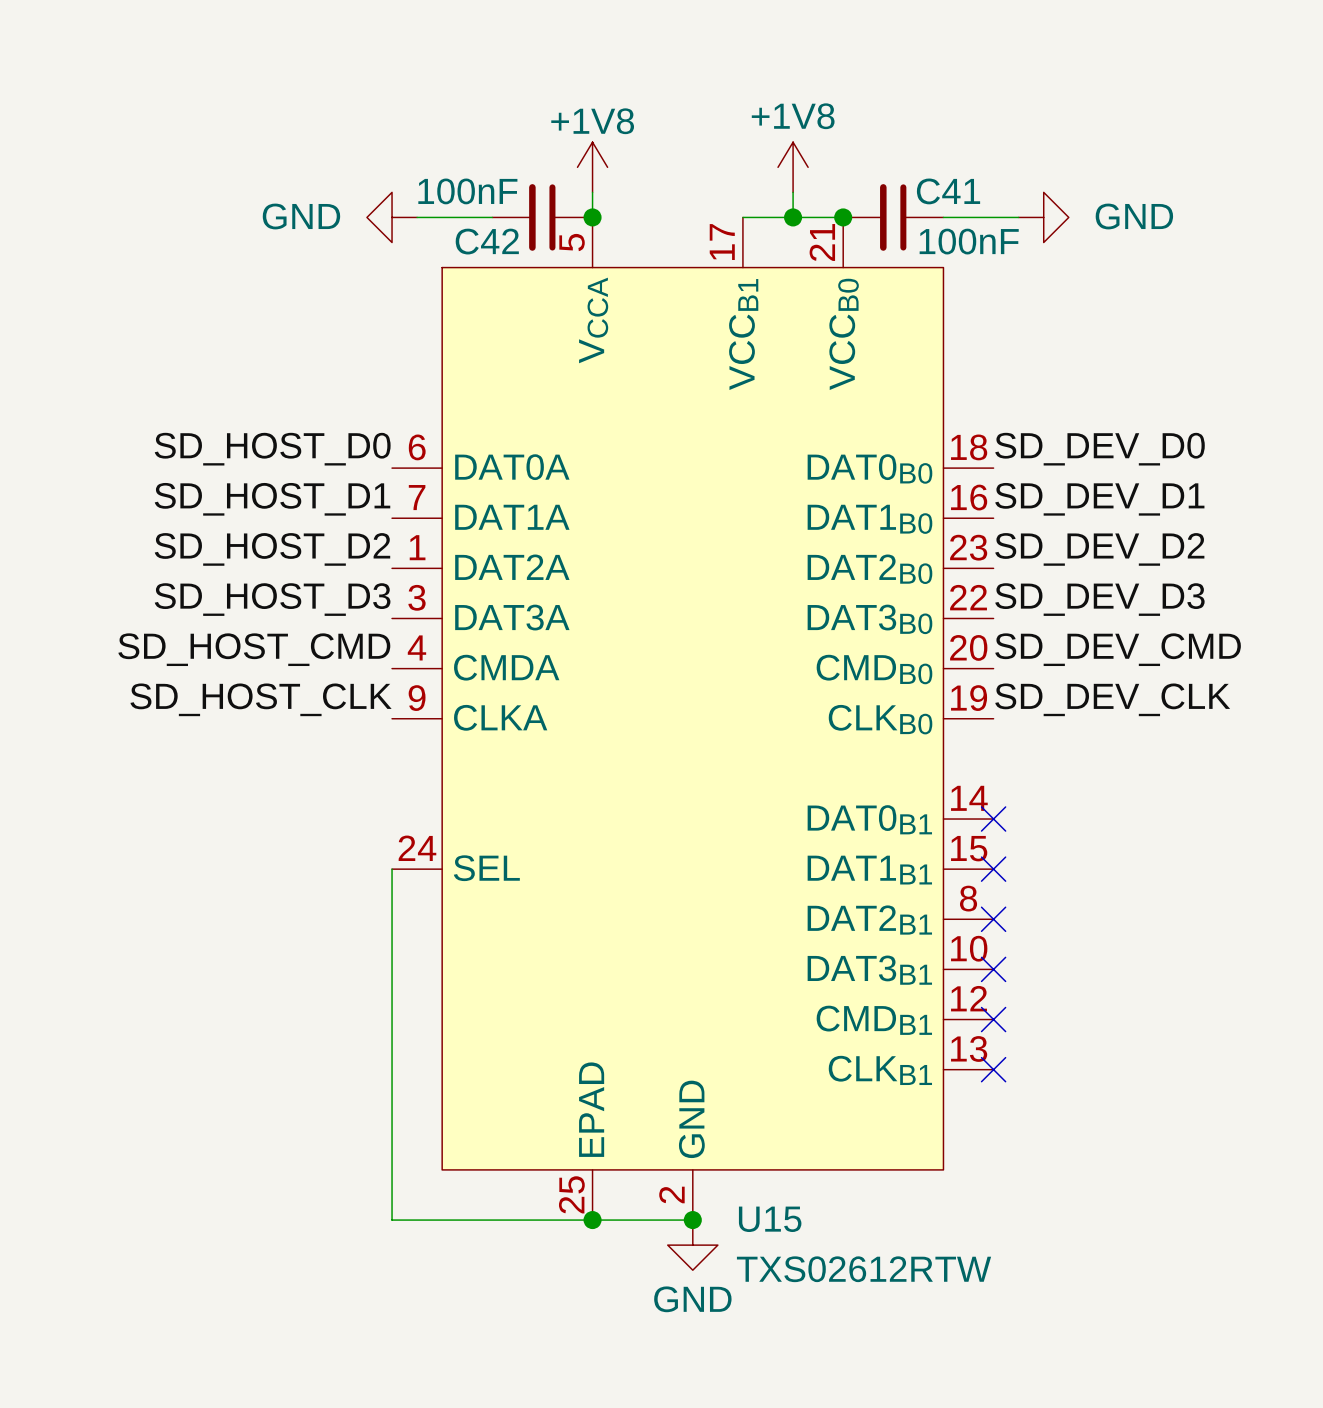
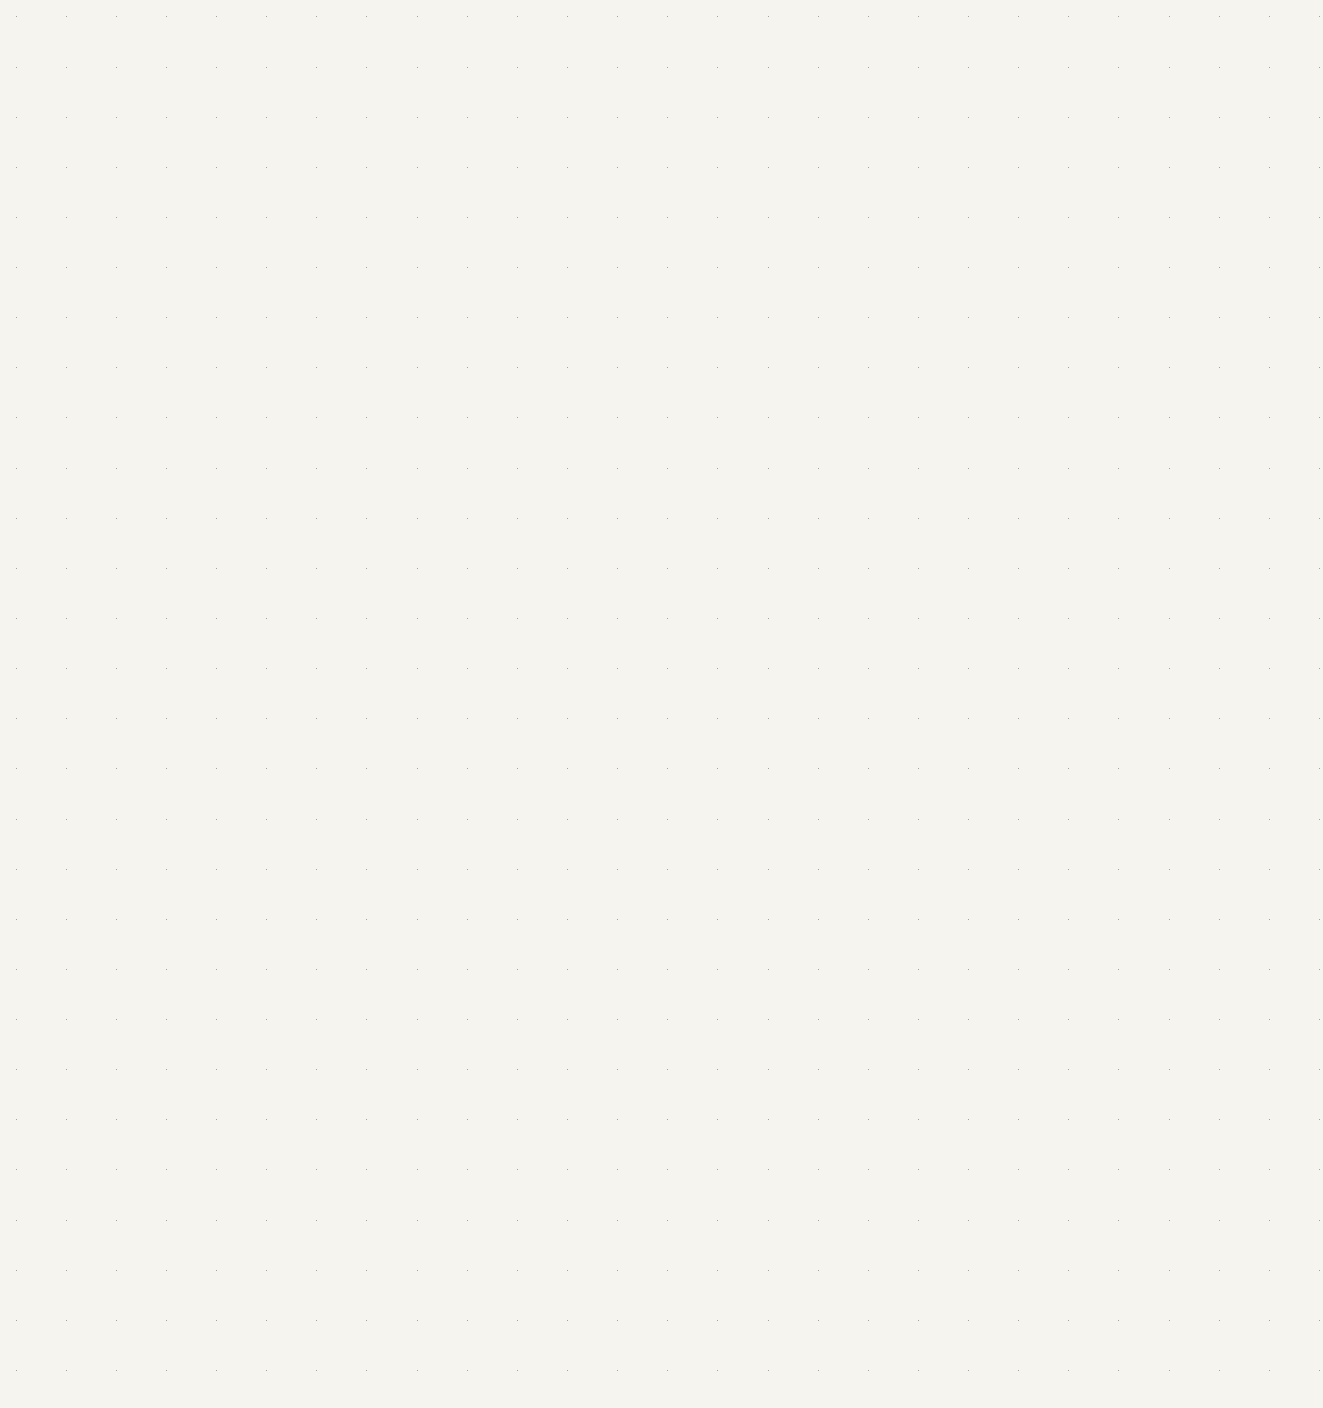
power symbol: +1V8 (592, 167) -> none
power symbol: +1V8 (793, 167) -> none
wire: (592, 192) (592, 217) -> none
wire: (793, 192) (793, 217) -> none
power symbol: GND (392, 217) -> none
wire: (417, 217) (492, 217) -> none
C42: 100nF (542, 217) -> none
junction: (592, 217) -> none
wire: (742, 217) (843, 217) -> none
junction: (793, 217) -> none
junction: (843, 217) -> none
C41: 100nF (893, 217) -> none
wire: (943, 217) (1018, 217) -> none
power symbol: GND (1043, 217) -> none
label: SD_HOST_D0 (272, 449) -> none
label: SD_DEV_D0 (1100, 449) -> none
label: SD_HOST_D1 (272, 499) -> none
label: SD_DEV_D1 (1099, 499) -> none
label: SD_HOST_D2 (272, 549) -> none
label: SD_DEV_D2 (1099, 549) -> none
label: SD_HOST_D3 (272, 599) -> none
label: SD_DEV_D3 (1099, 599) -> none
label: SD_HOST_CMD (254, 649) -> none
label: SD_DEV_CMD (1118, 649) -> none
label: SD_HOST_CLK (261, 699) -> none
label: SD_DEV_CLK (1112, 699) -> none
U15: TXS02612RTW (692, 718) -> none
no-connect mark: (993, 819) -> none
wire: (392, 869) (392, 1220) (692, 1220) -> none
no-connect mark: (993, 869) -> none
no-connect mark: (993, 919) -> none
no-connect mark: (993, 969) -> none
no-connect mark: (993, 1019) -> none
no-connect mark: (993, 1069) -> none
junction: (592, 1220) -> none
junction: (692, 1220) -> none
power symbol: GND (692, 1245) -> none

